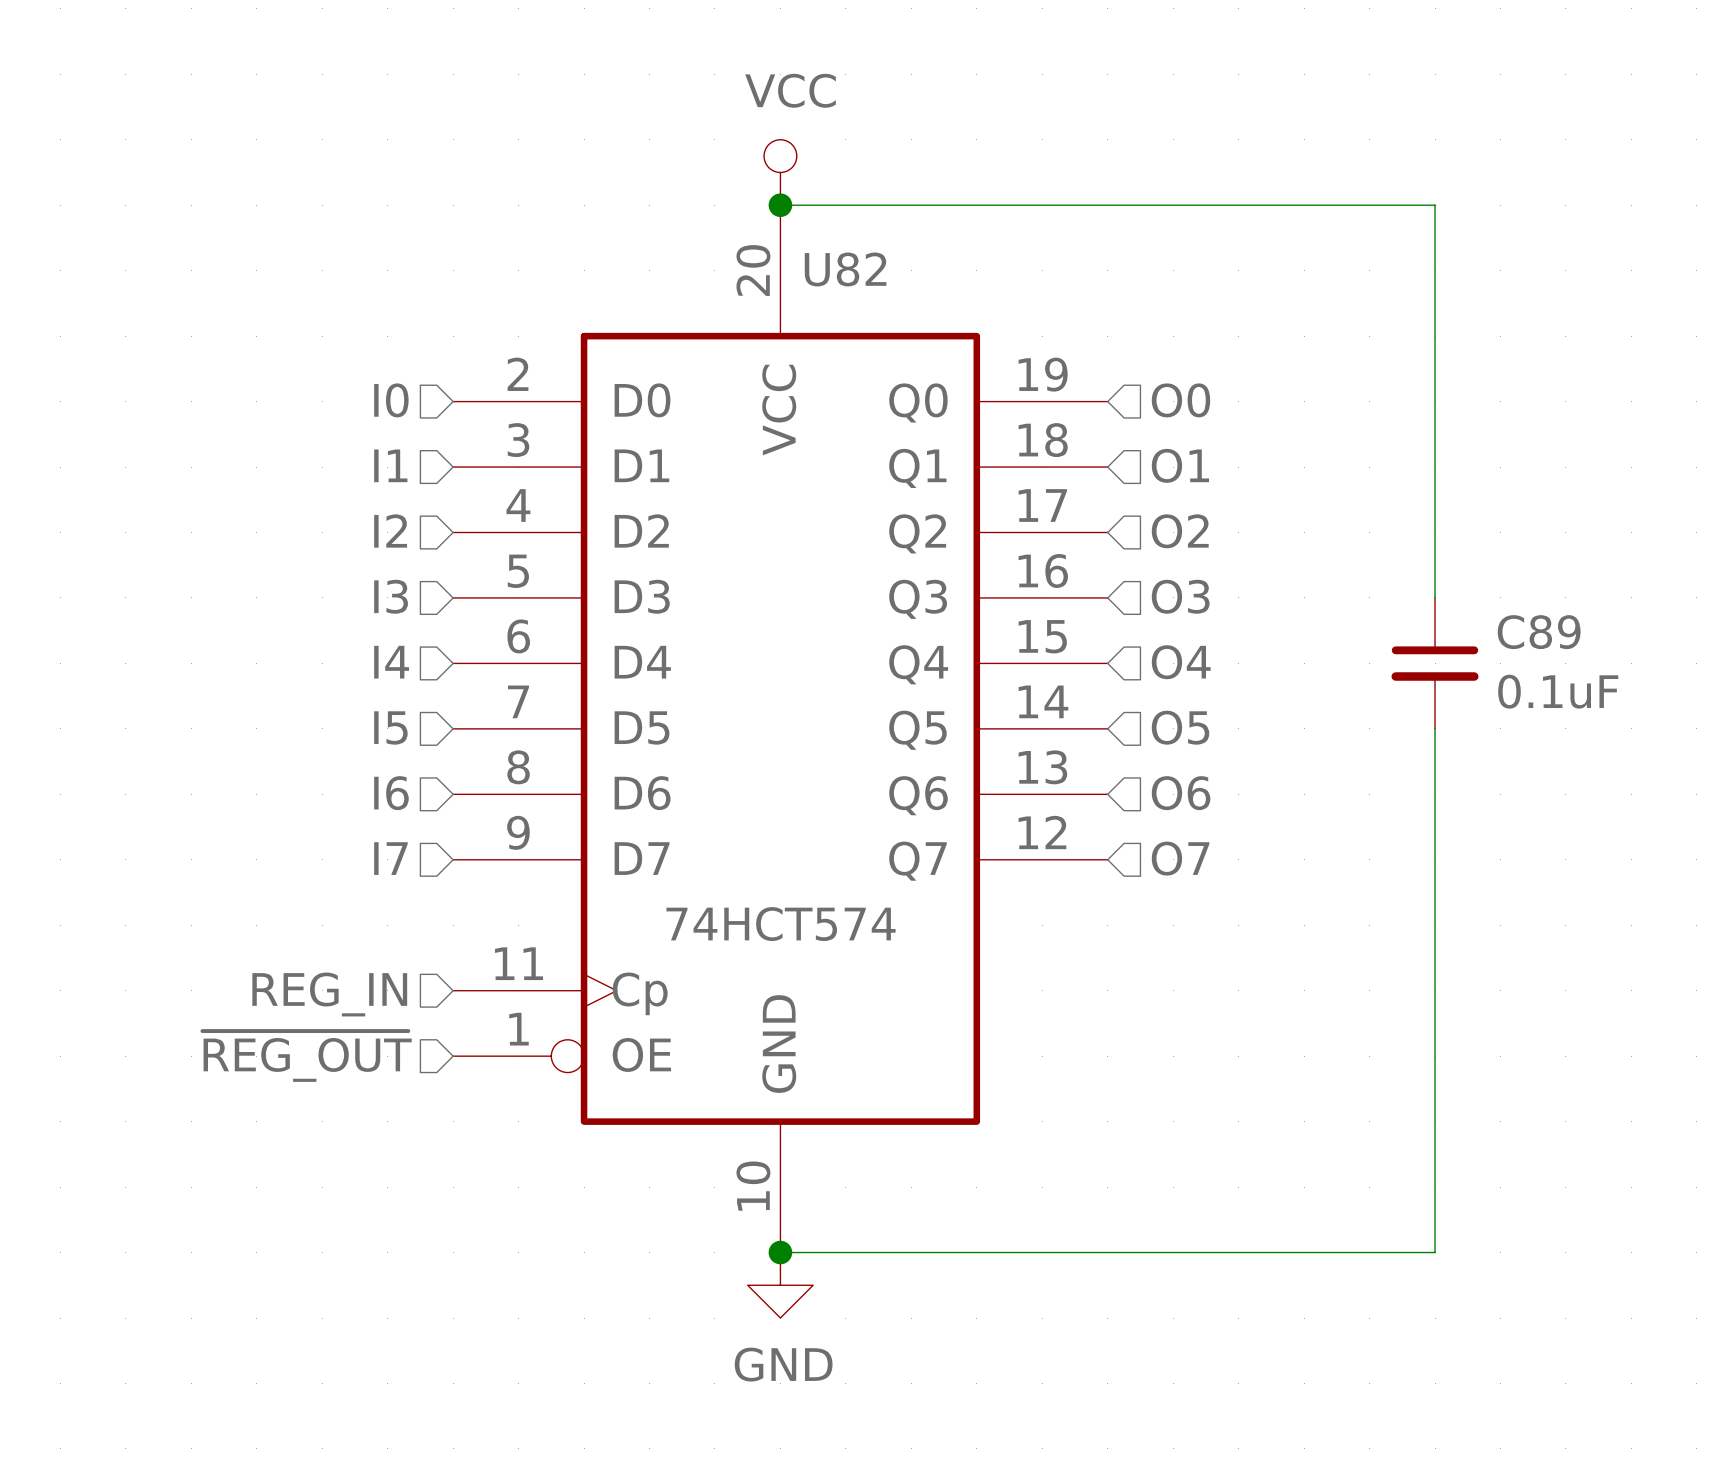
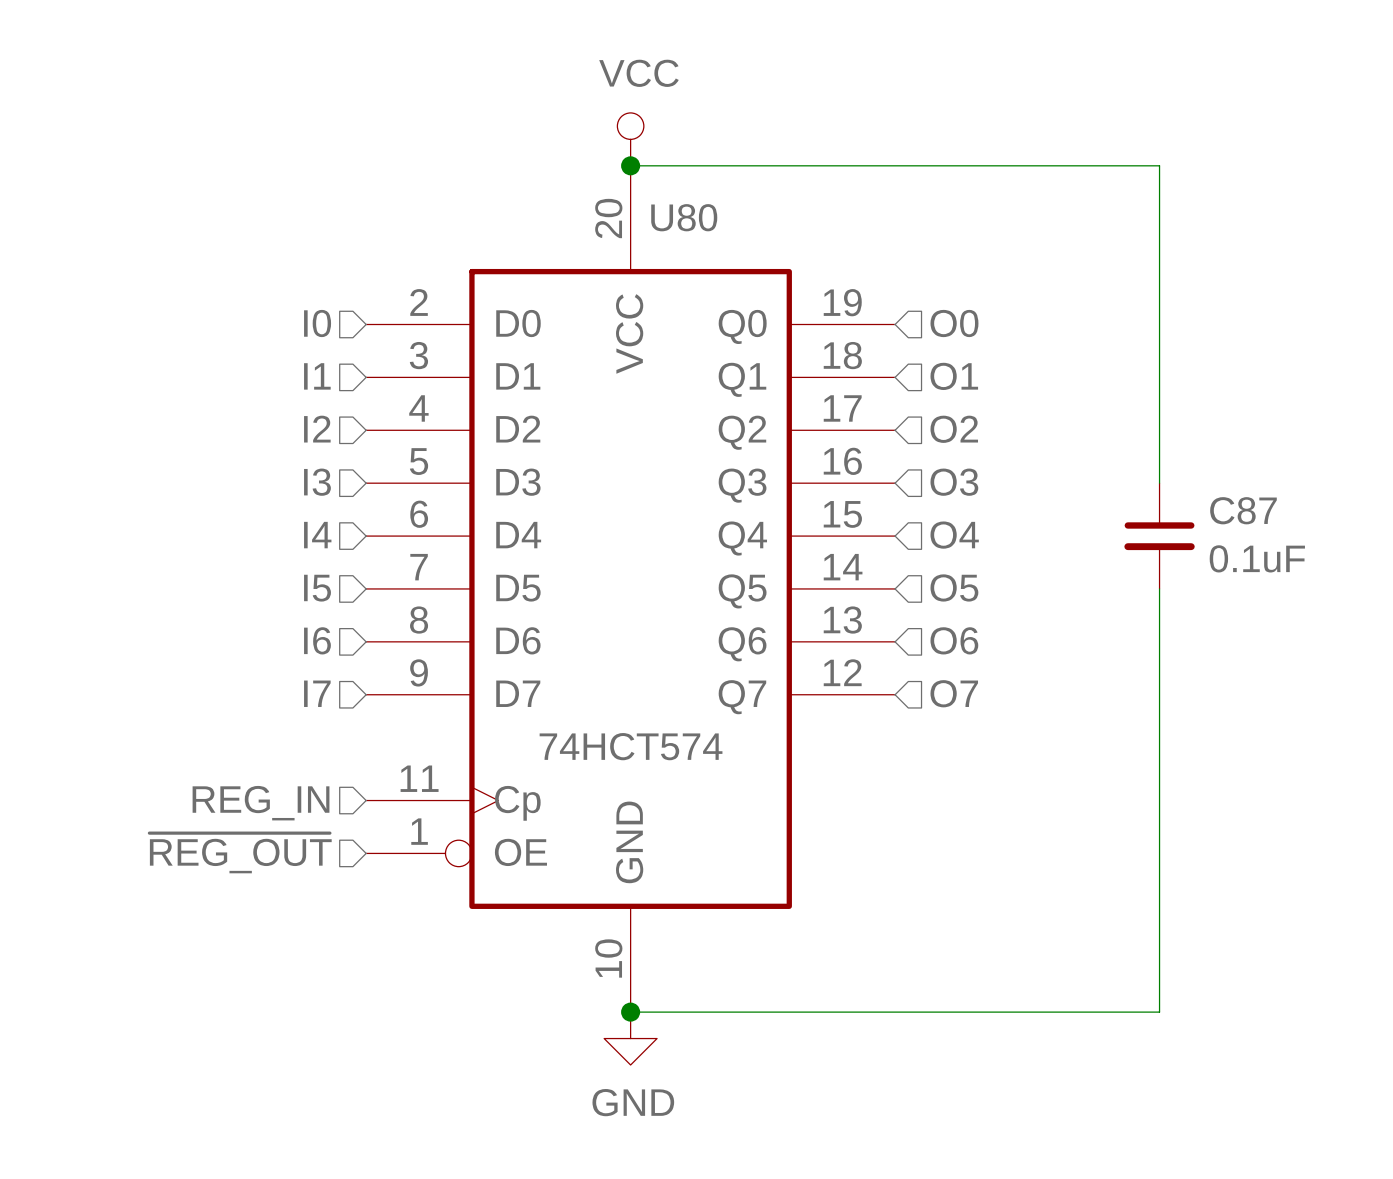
U82 name: U82 (845, 269) -> U80 (684, 217)
C89 name: C89 (1539, 632) -> C87 (1243, 510)

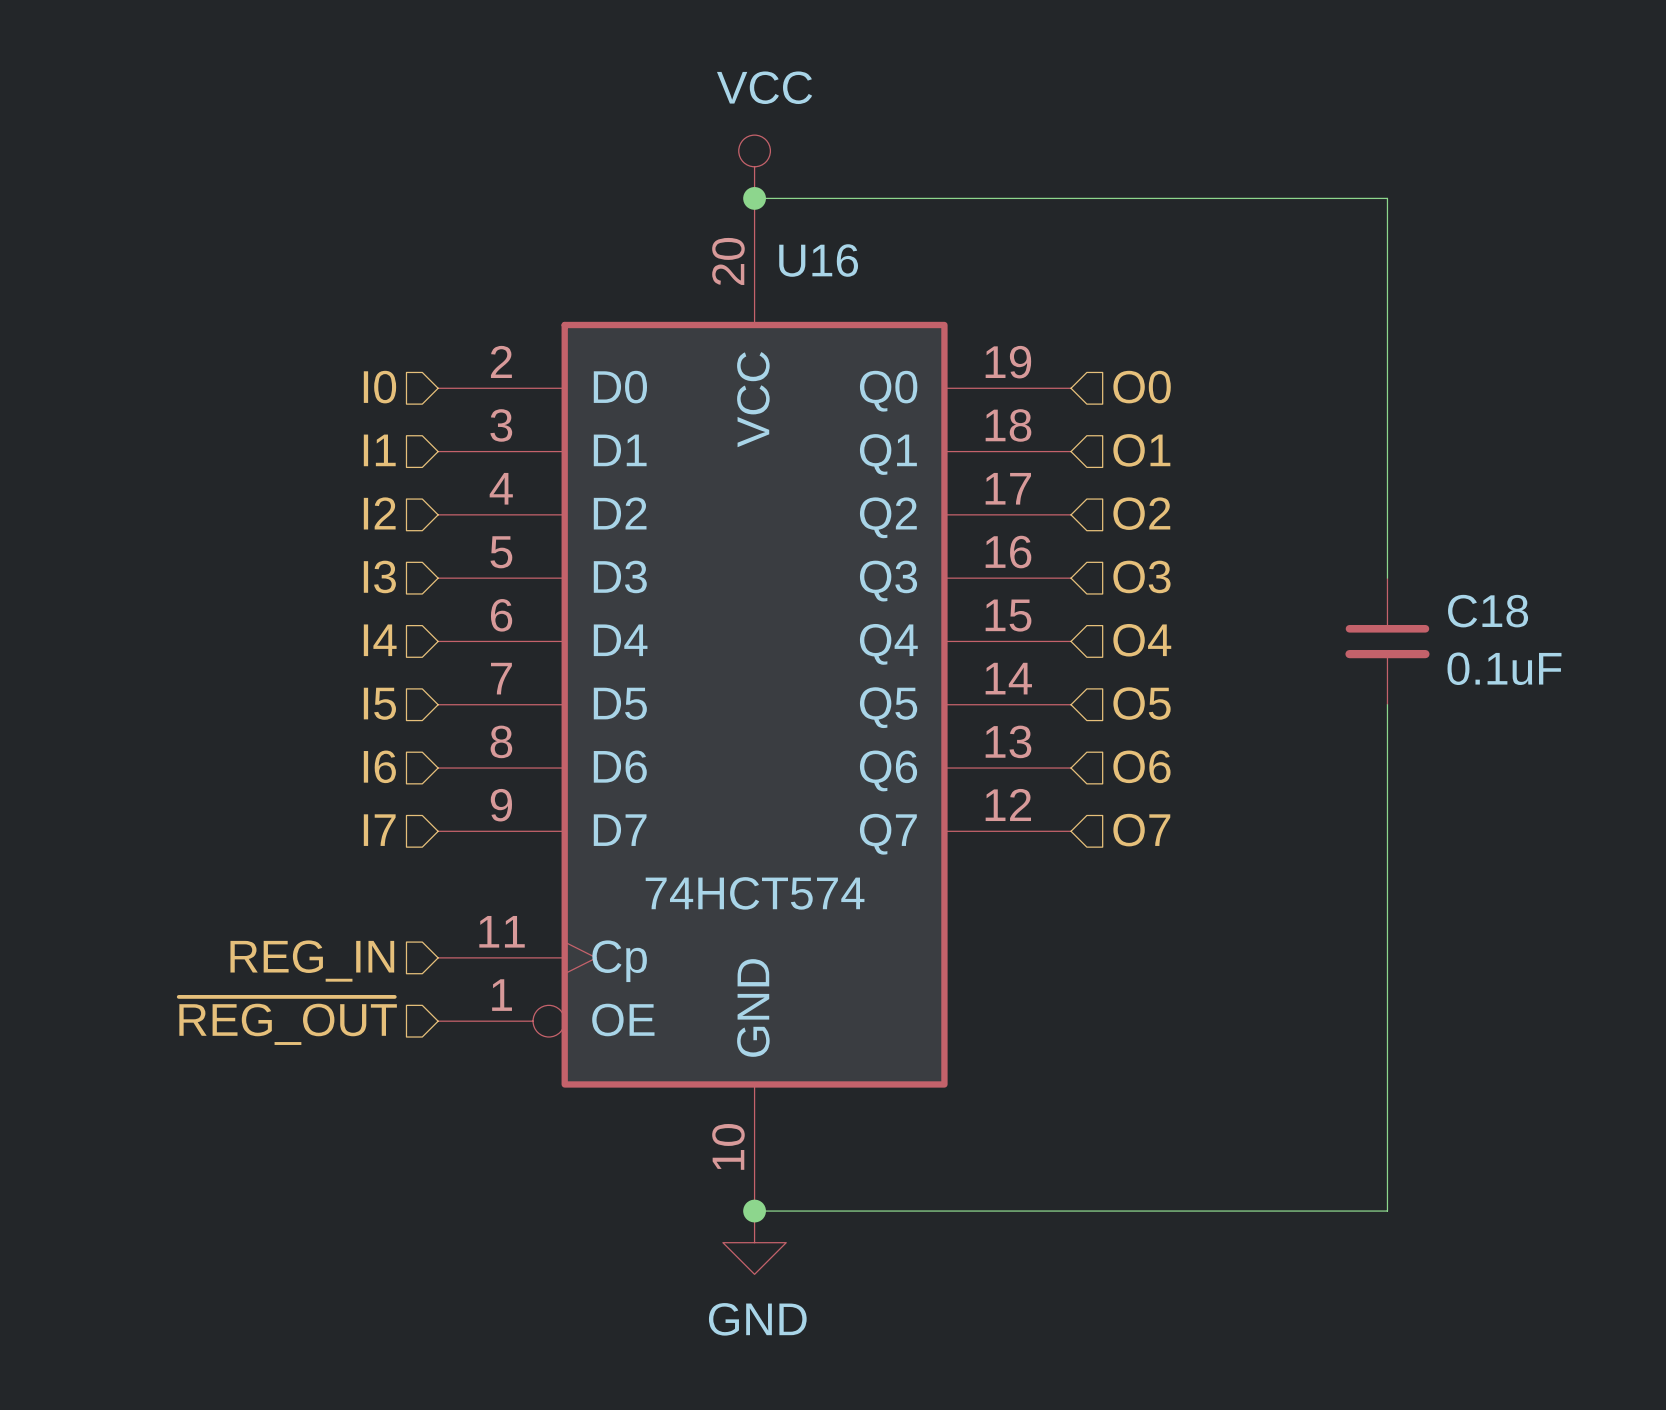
U80 name: U80 (684, 217) -> U16 (818, 260)
C87 name: C87 (1243, 510) -> C18 (1488, 611)

